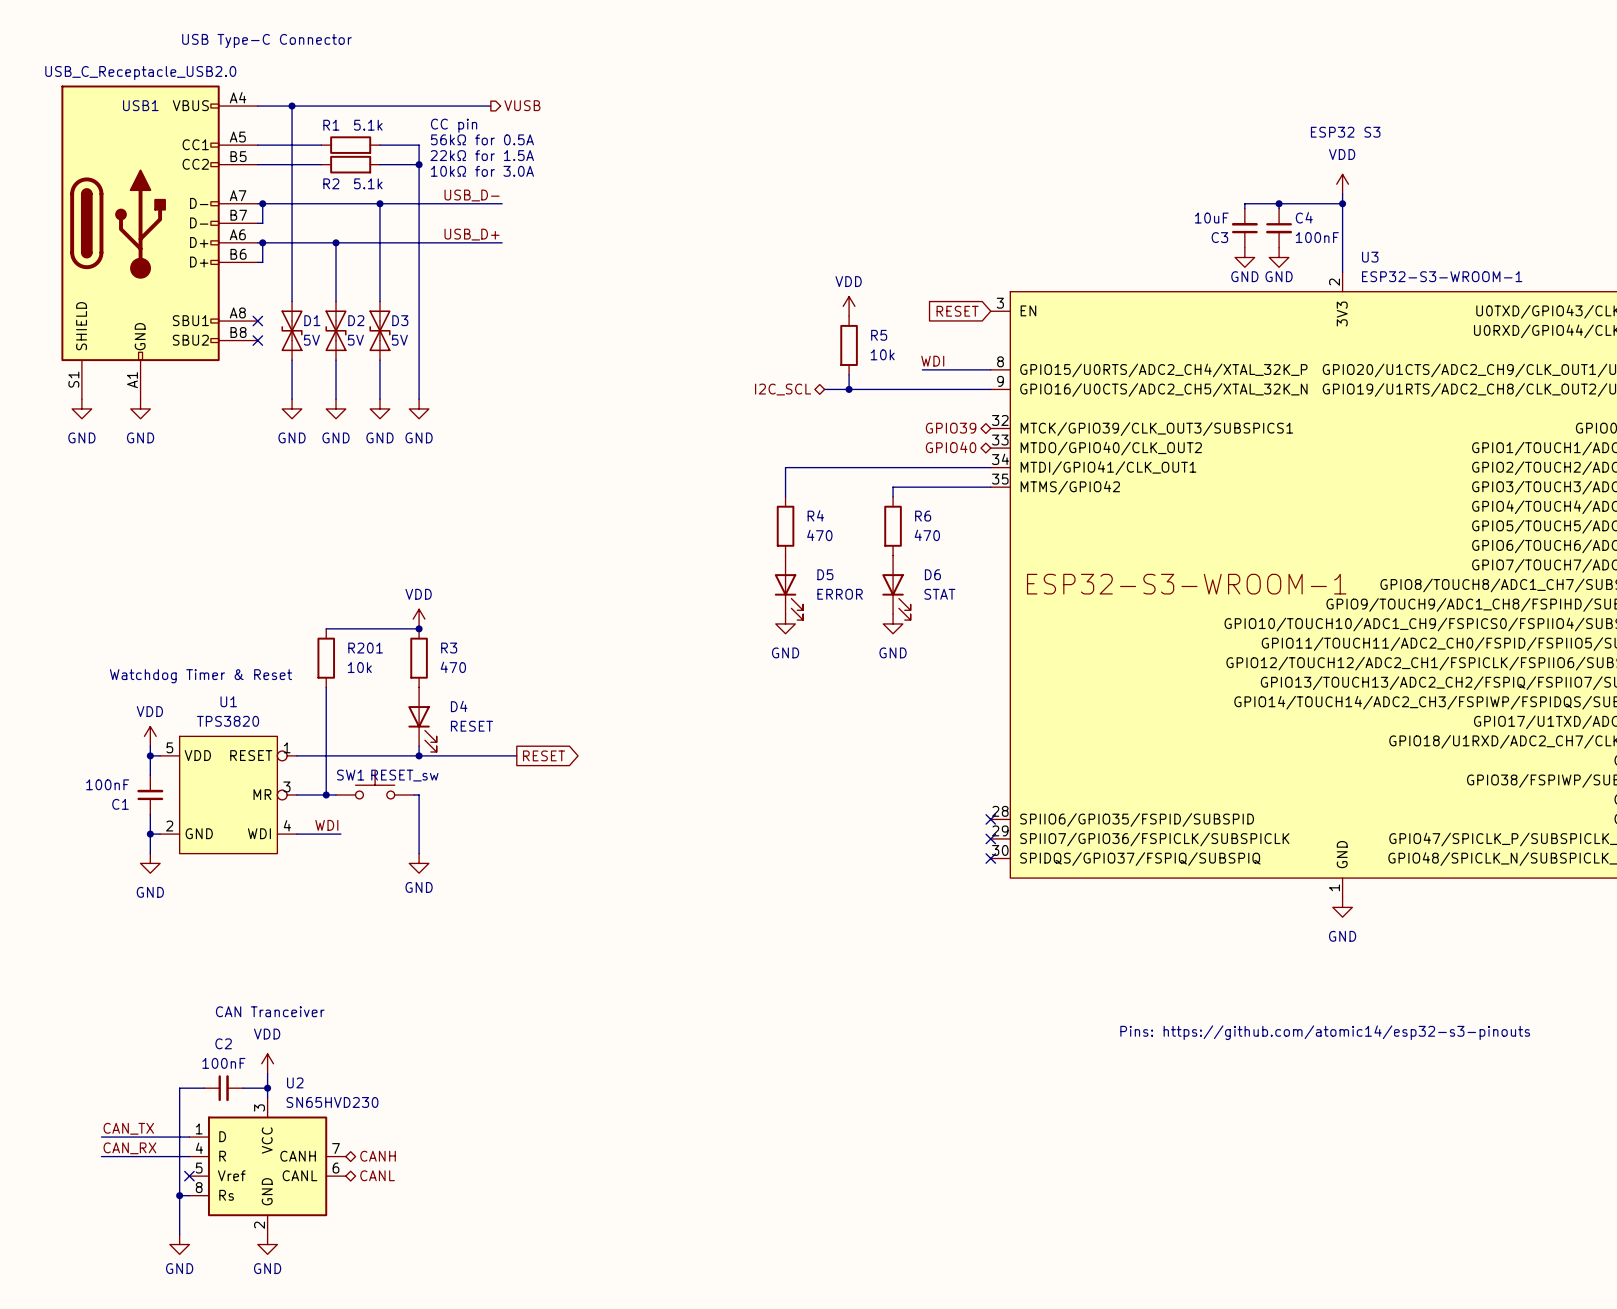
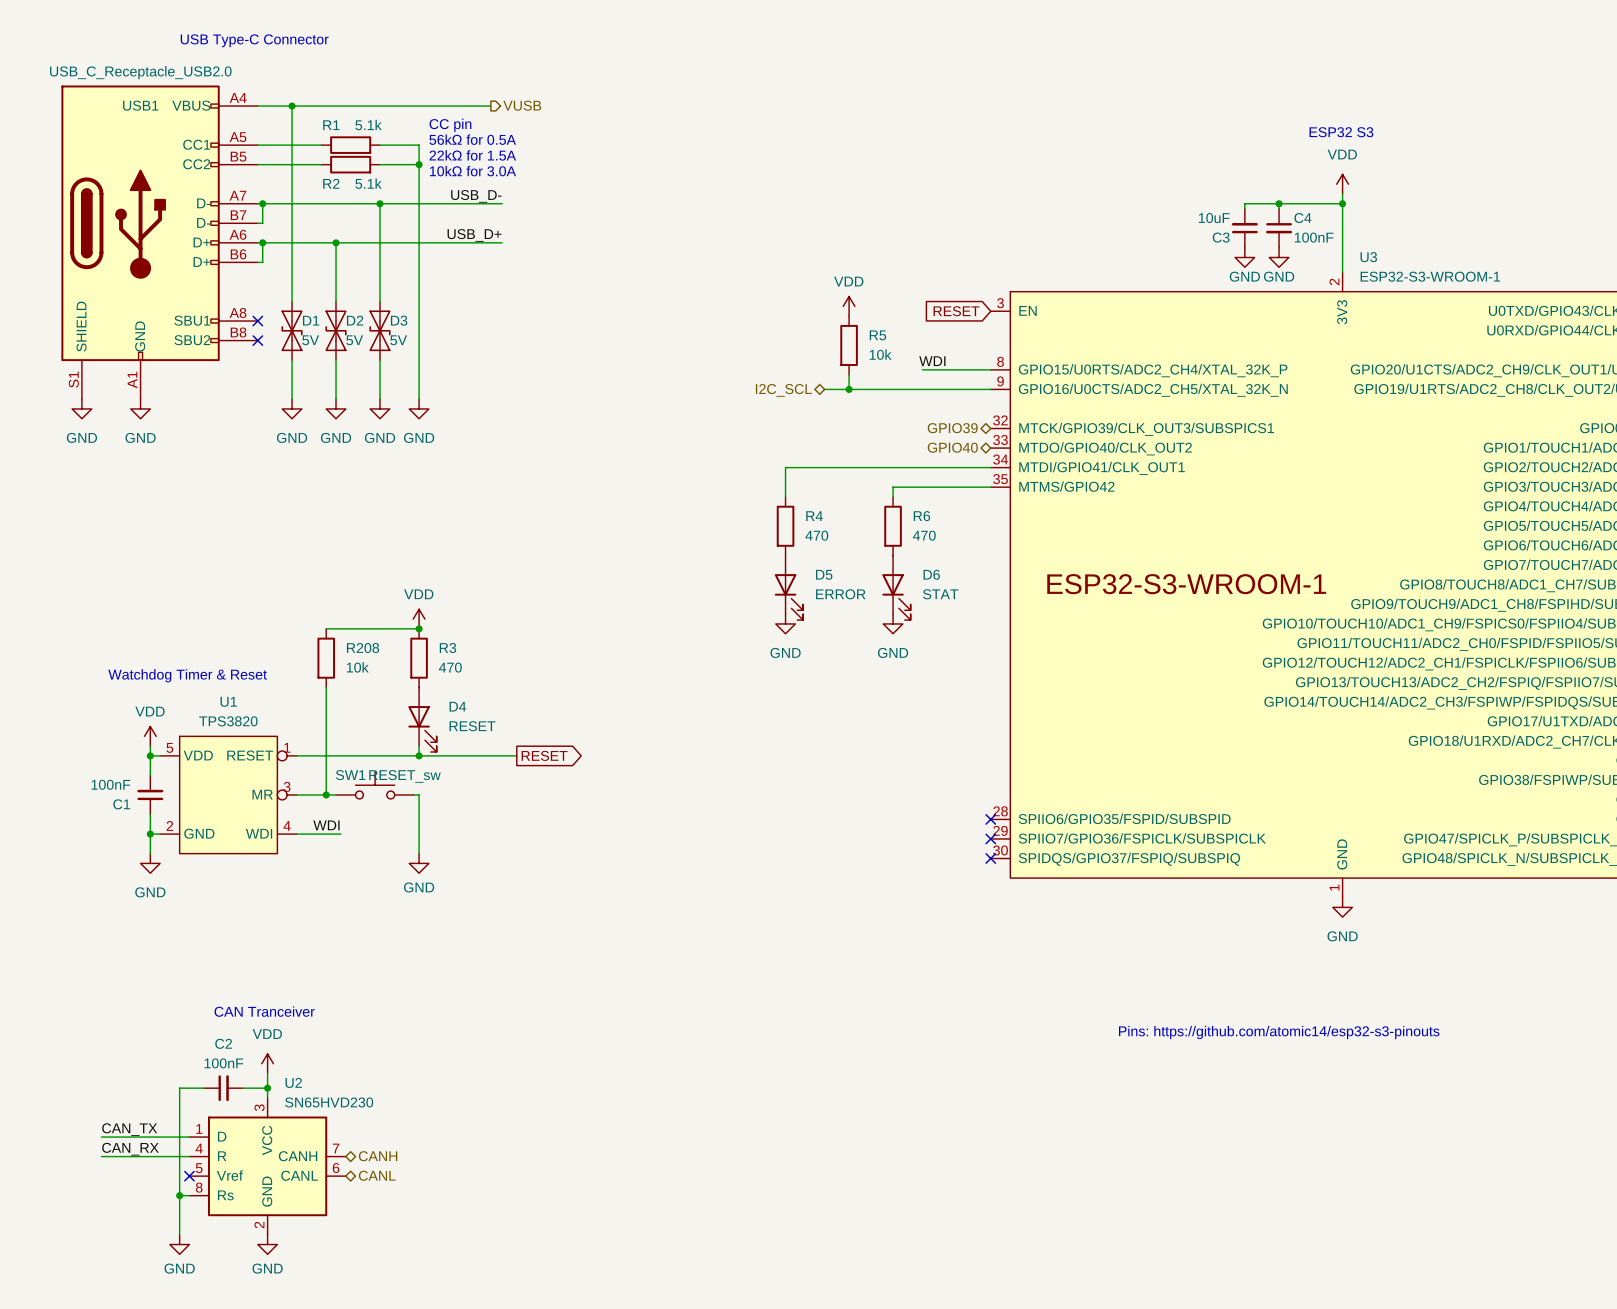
R201 name: R201 (365, 648) -> R208 (363, 648)

